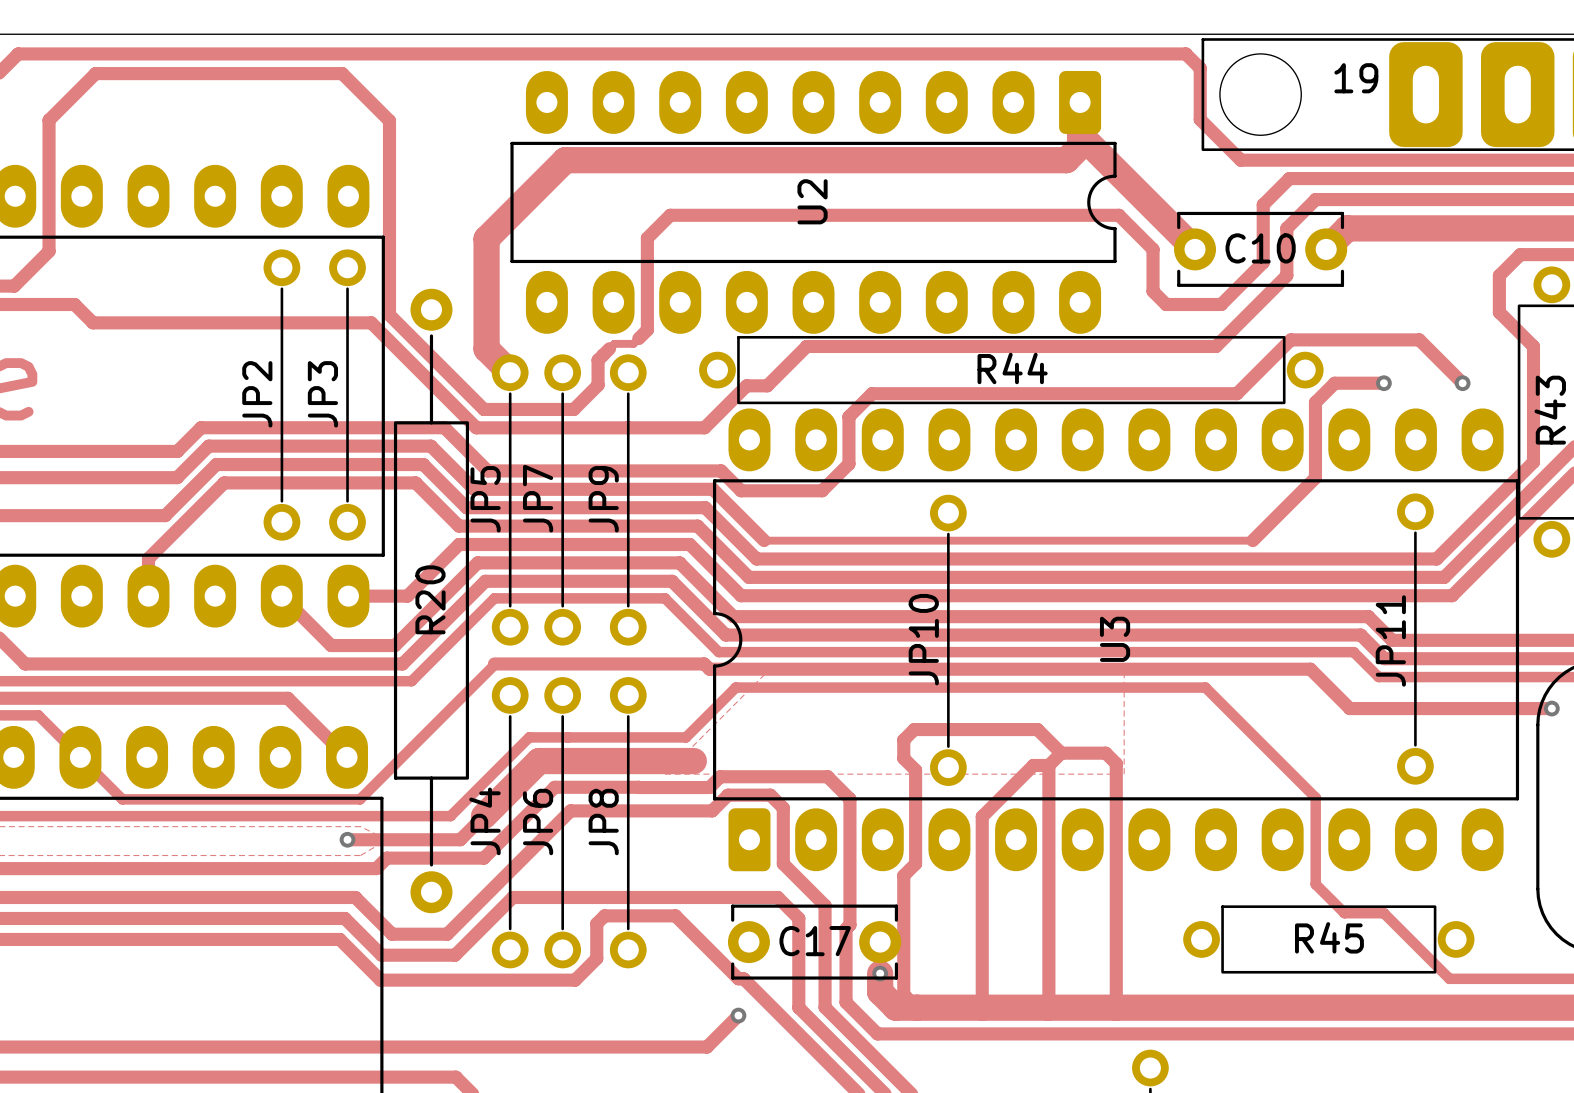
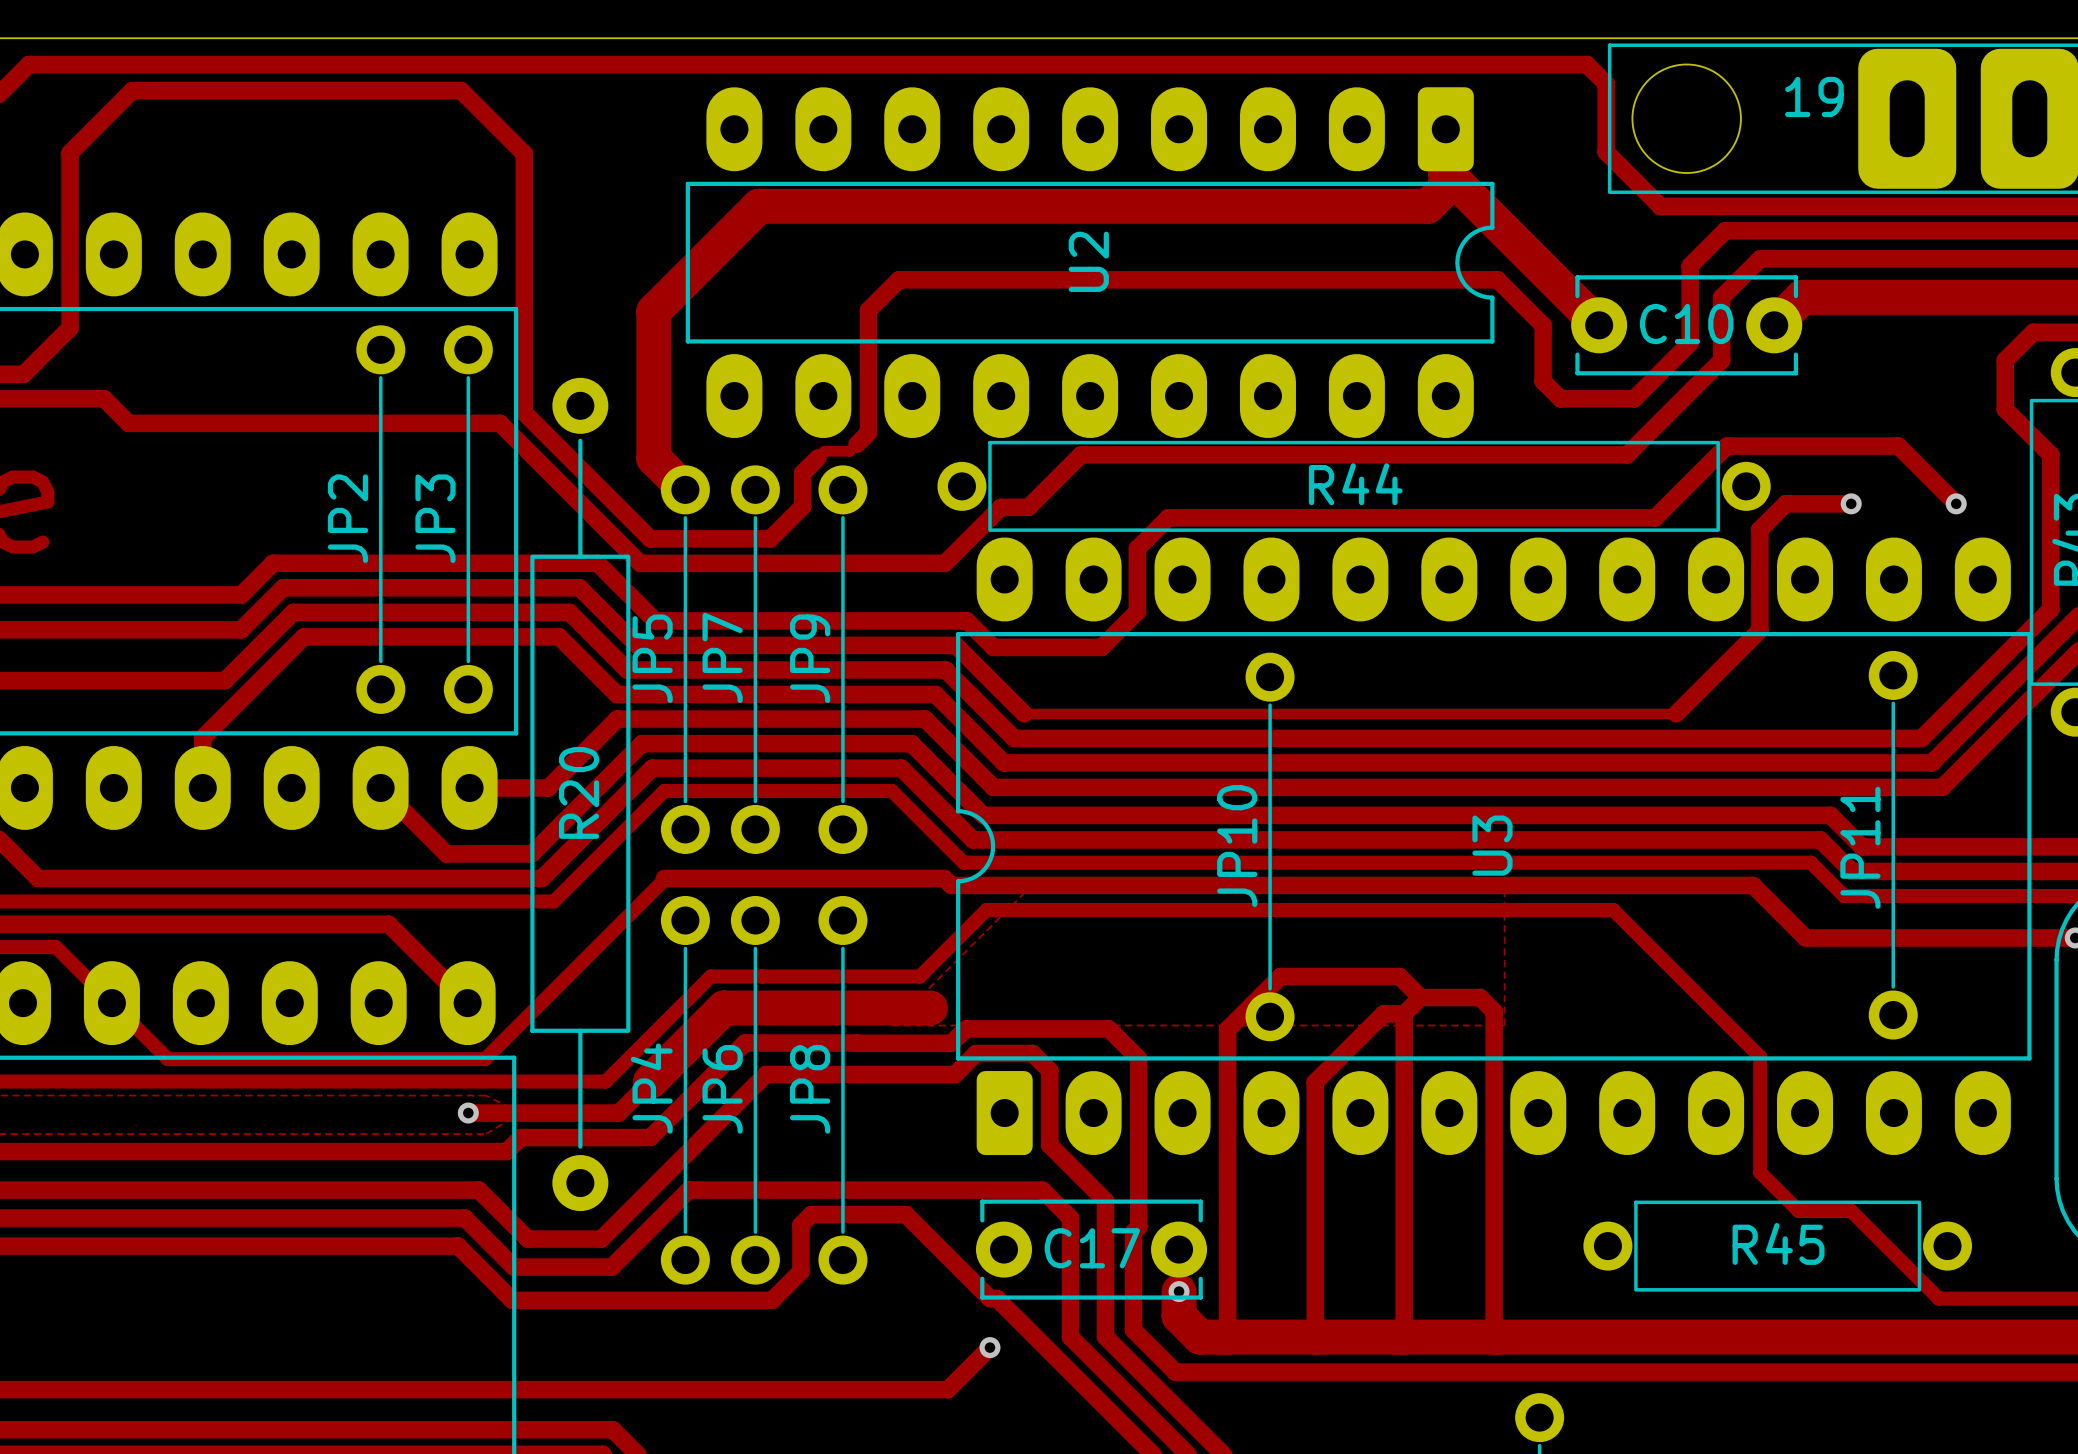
track: (1045, 737) (1037, 729) (914, 729) (903, 740) (903, 758) (915, 770) (915, 863) (903, 875) (903, 994) (916, 1007) -> (1399, 976) (1280, 976) (1227, 1029) (1227, 1336)

